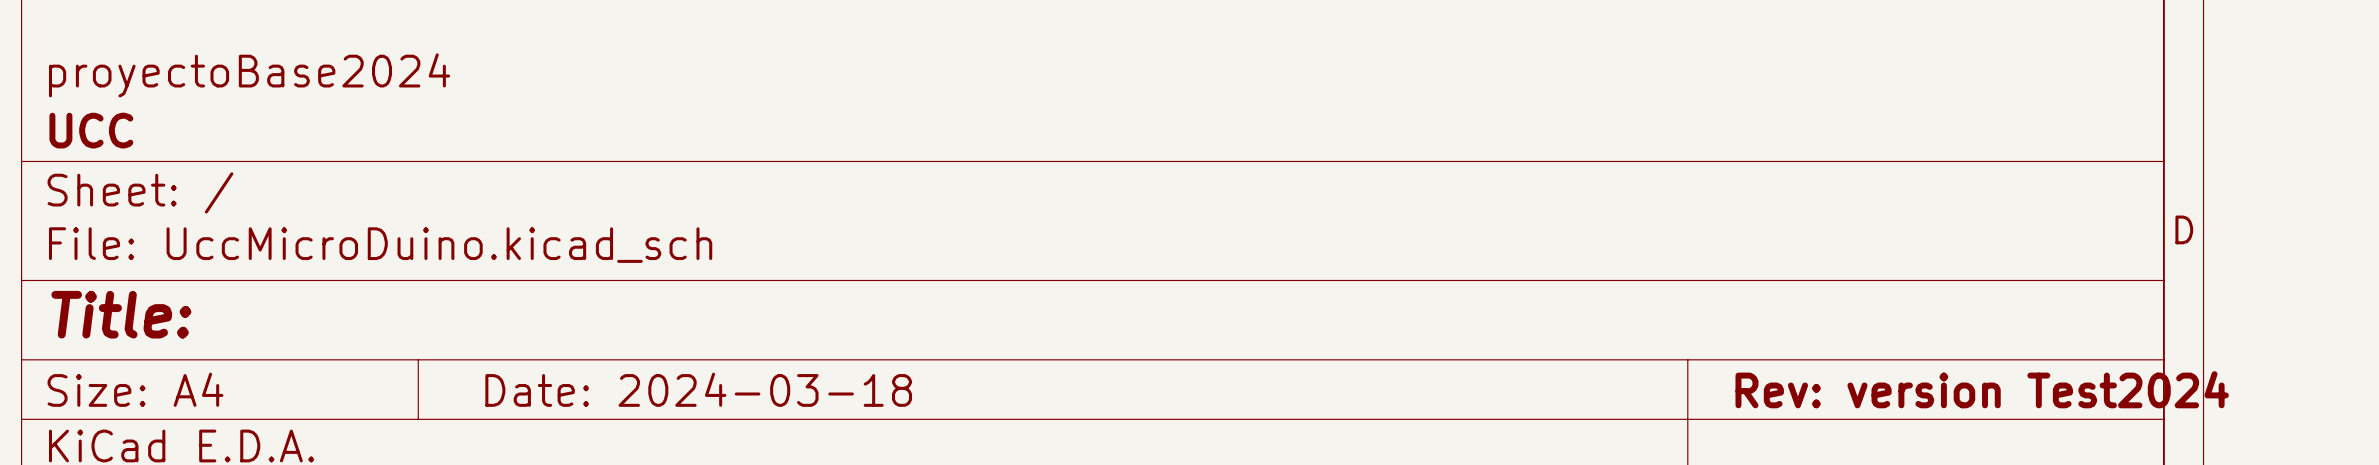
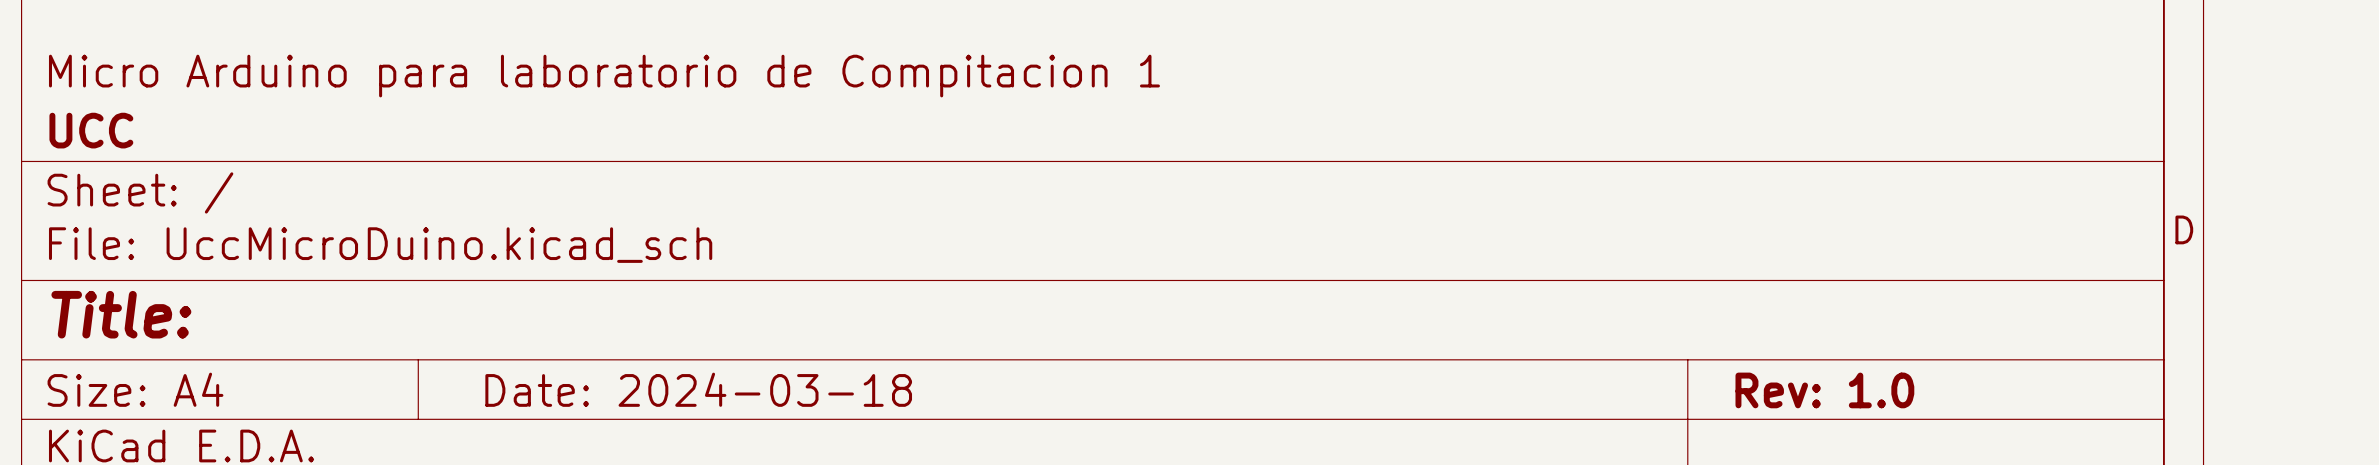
title block: proyectoBase2024 (249, 75) -> Micro Arduino para laboratorio de Compitacion 1 (604, 76)
title block: Rev: version Test2024 (1982, 389) -> Rev: 1.0 (1824, 390)

